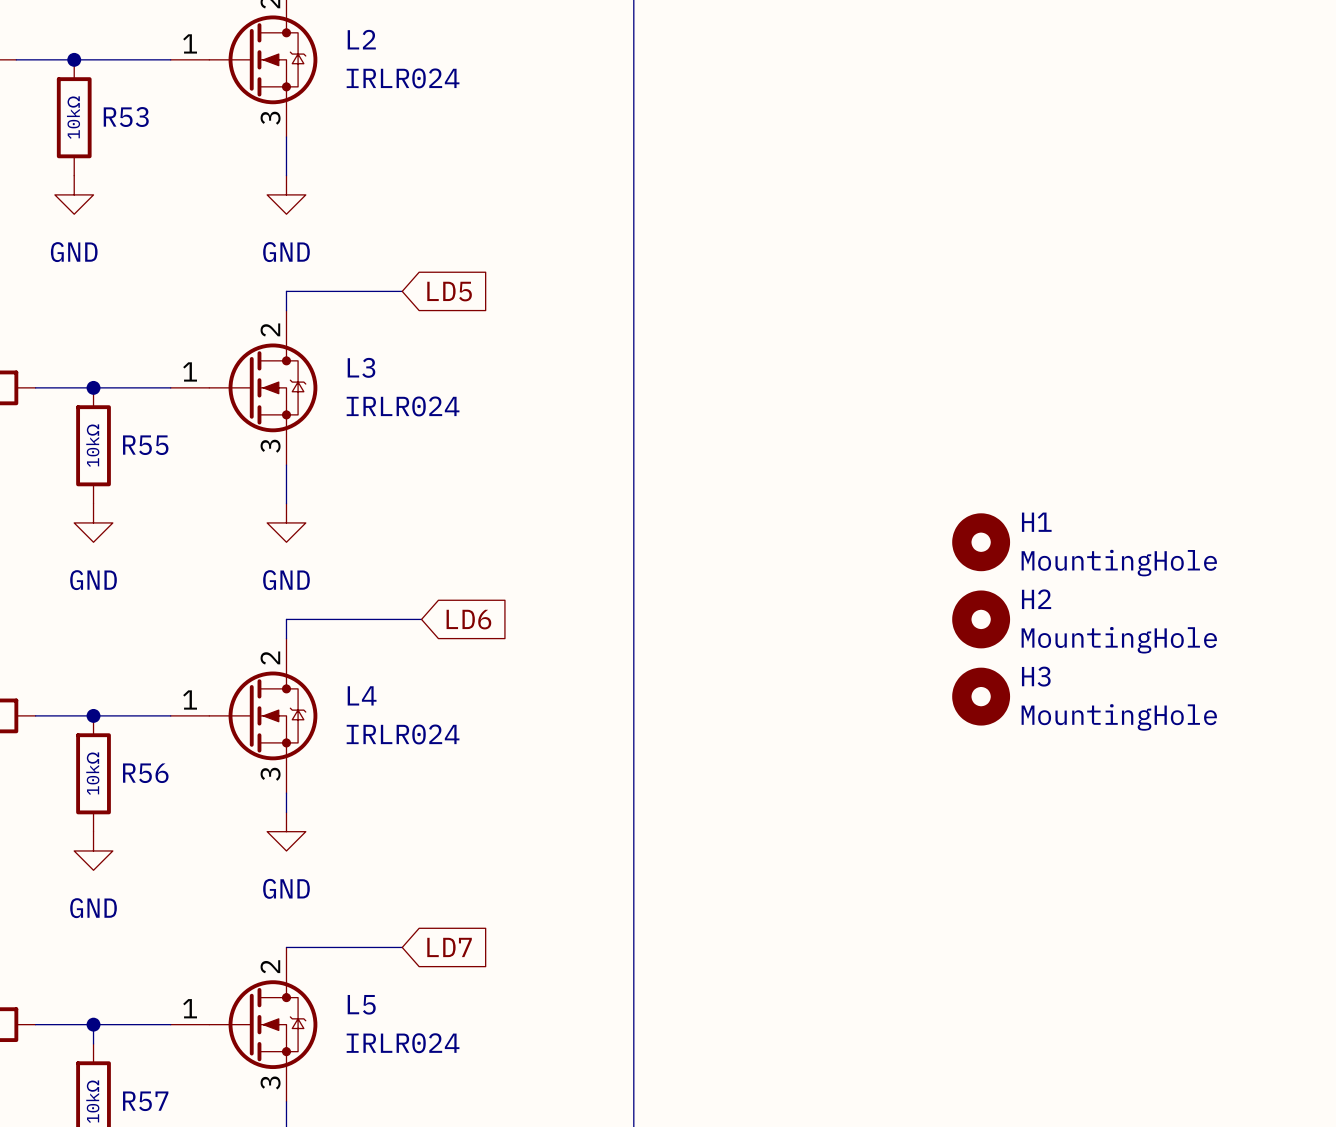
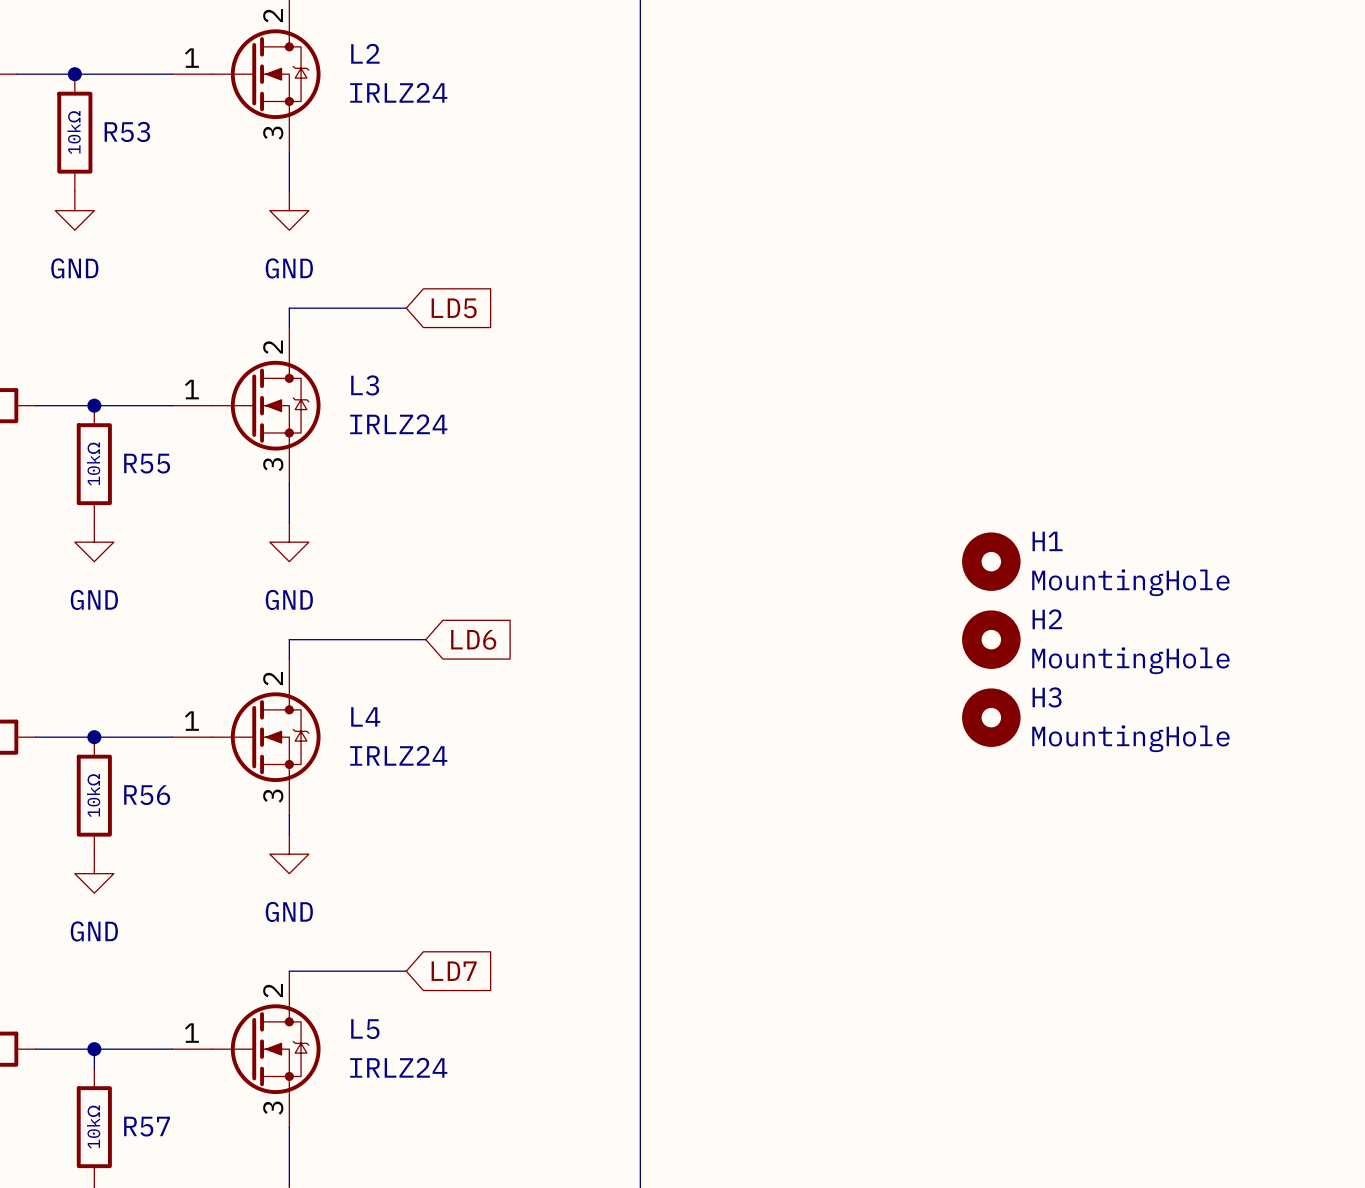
L2 value: IRLR024 (403, 78) -> IRLZ24 (398, 92)
L3 value: IRLR024 (403, 406) -> IRLZ24 (398, 424)
L4 value: IRLR024 (403, 734) -> IRLZ24 (398, 755)
L5 value: IRLR024 (403, 1043) -> IRLZ24 (398, 1067)

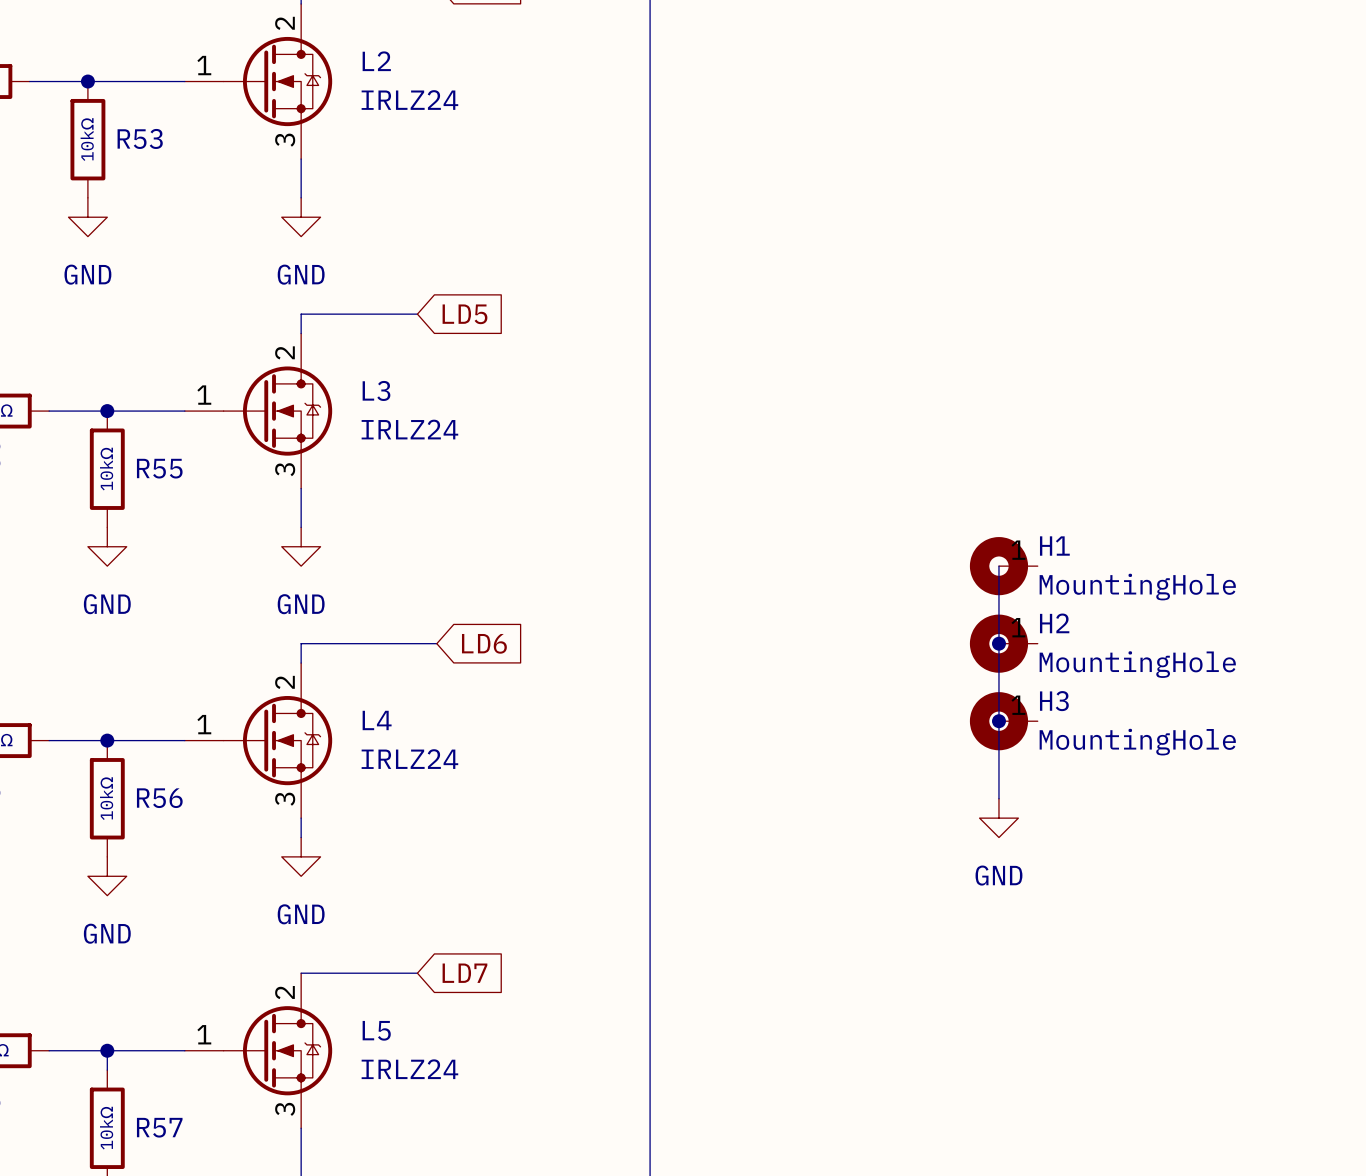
H1 symbol: [962, 532, 1021, 591] -> [969, 537, 1038, 596]
wire: none -> (998, 566) (998, 798)
H2 symbol: [962, 610, 1021, 669] -> [969, 614, 1038, 673]
junction: none -> (998, 643)
H3 symbol: [962, 688, 1021, 747] -> [969, 692, 1038, 751]
junction: none -> (998, 721)
power symbol: none -> GND (998, 818)

